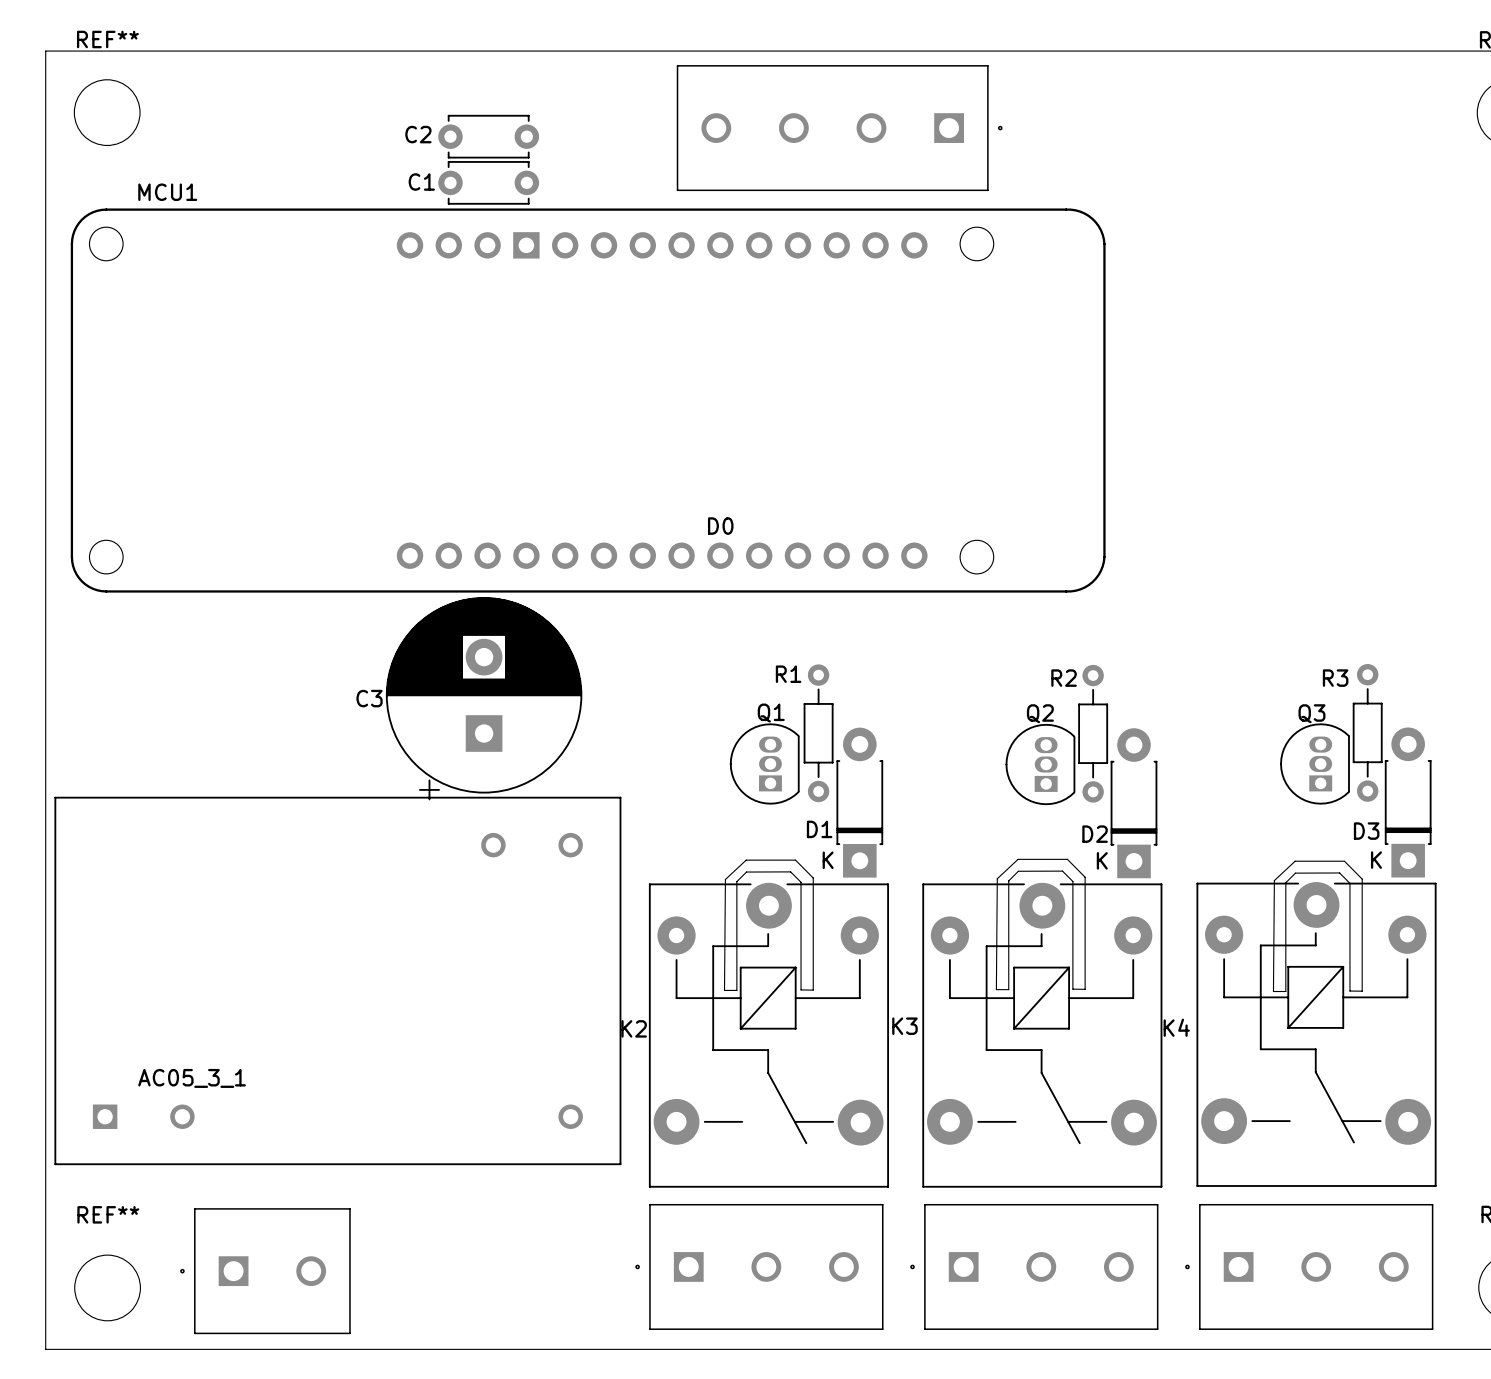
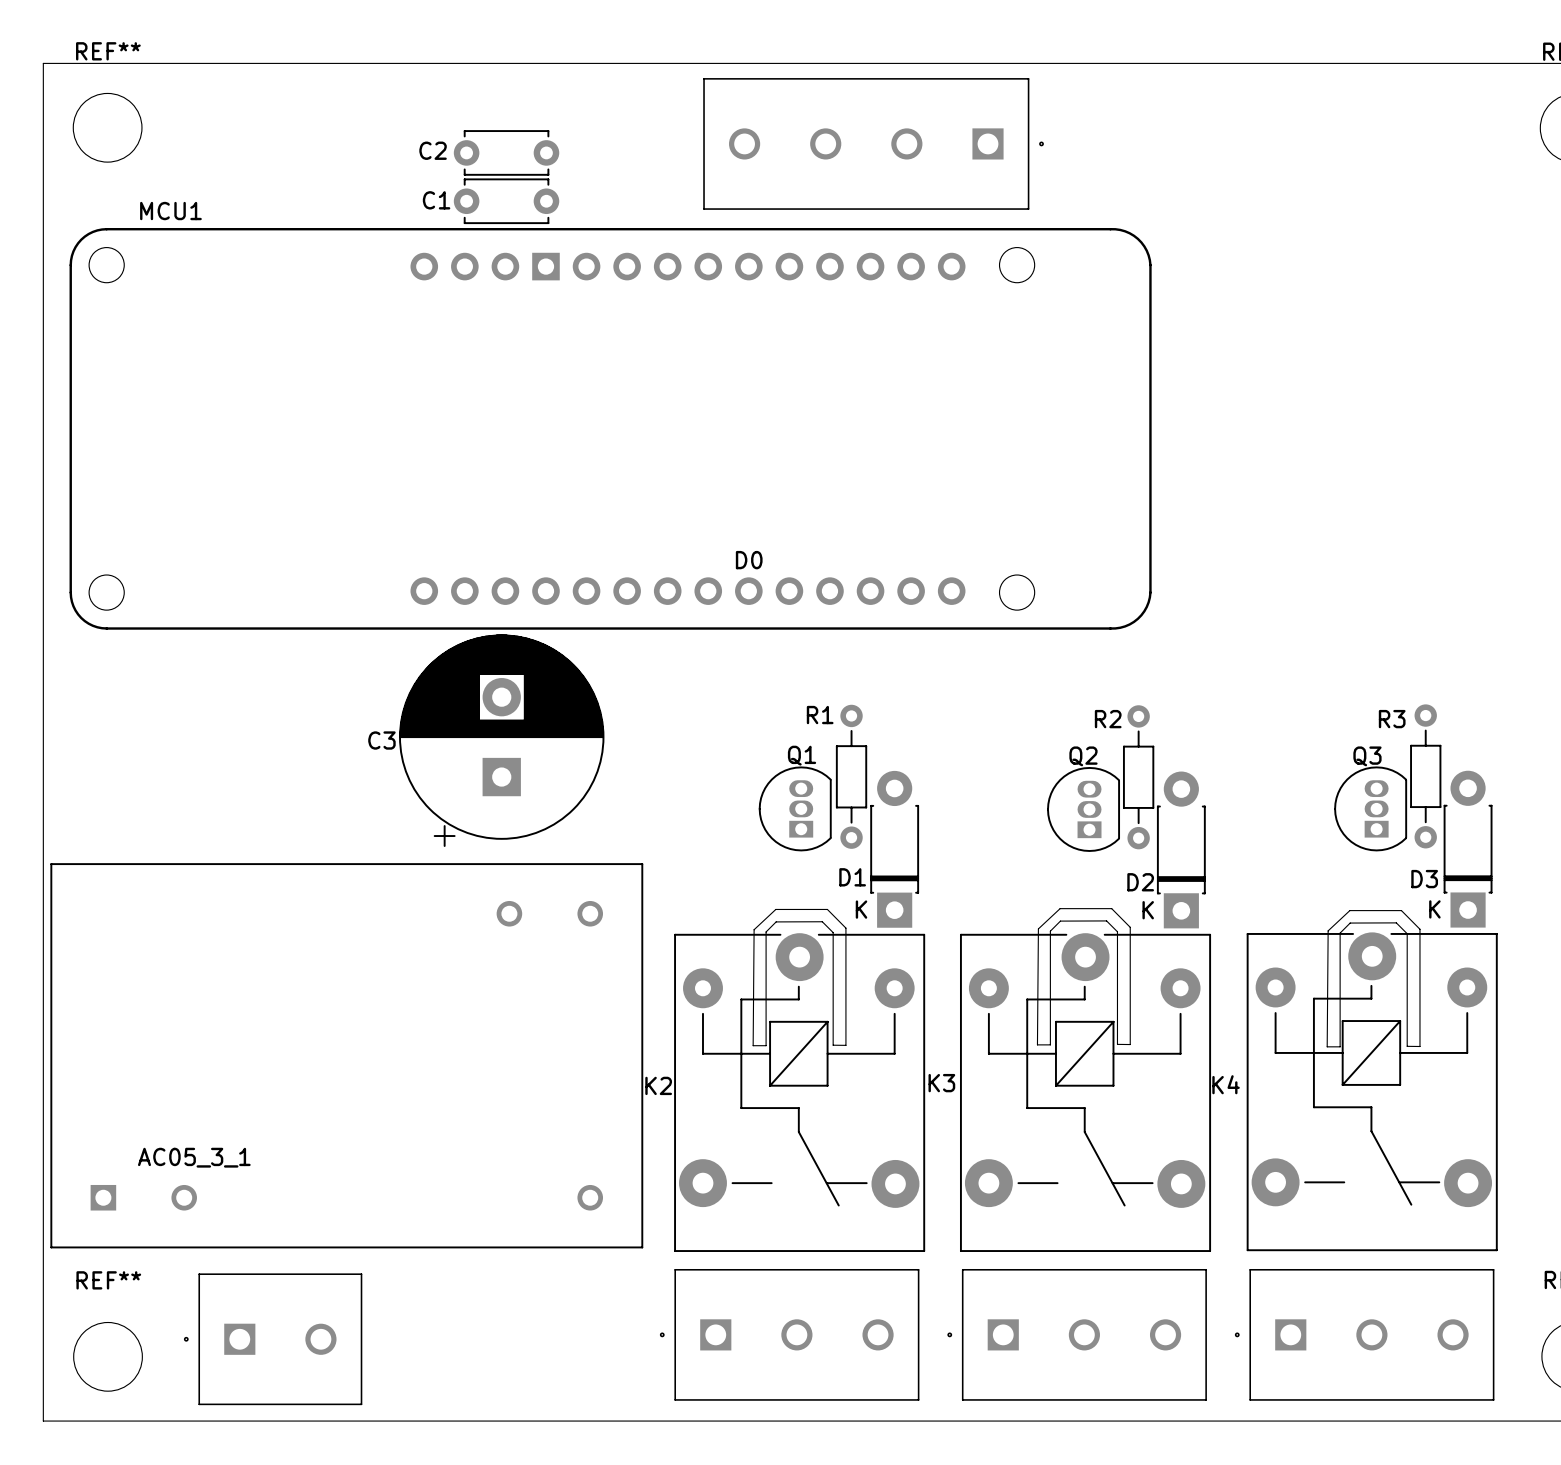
AC05_3_1 position: (337, 980) -> (346, 1055)

